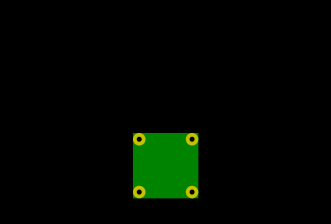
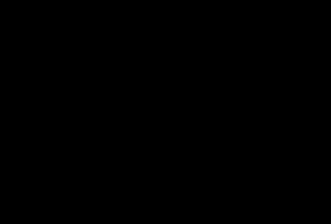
part: (165, 165) -> none

